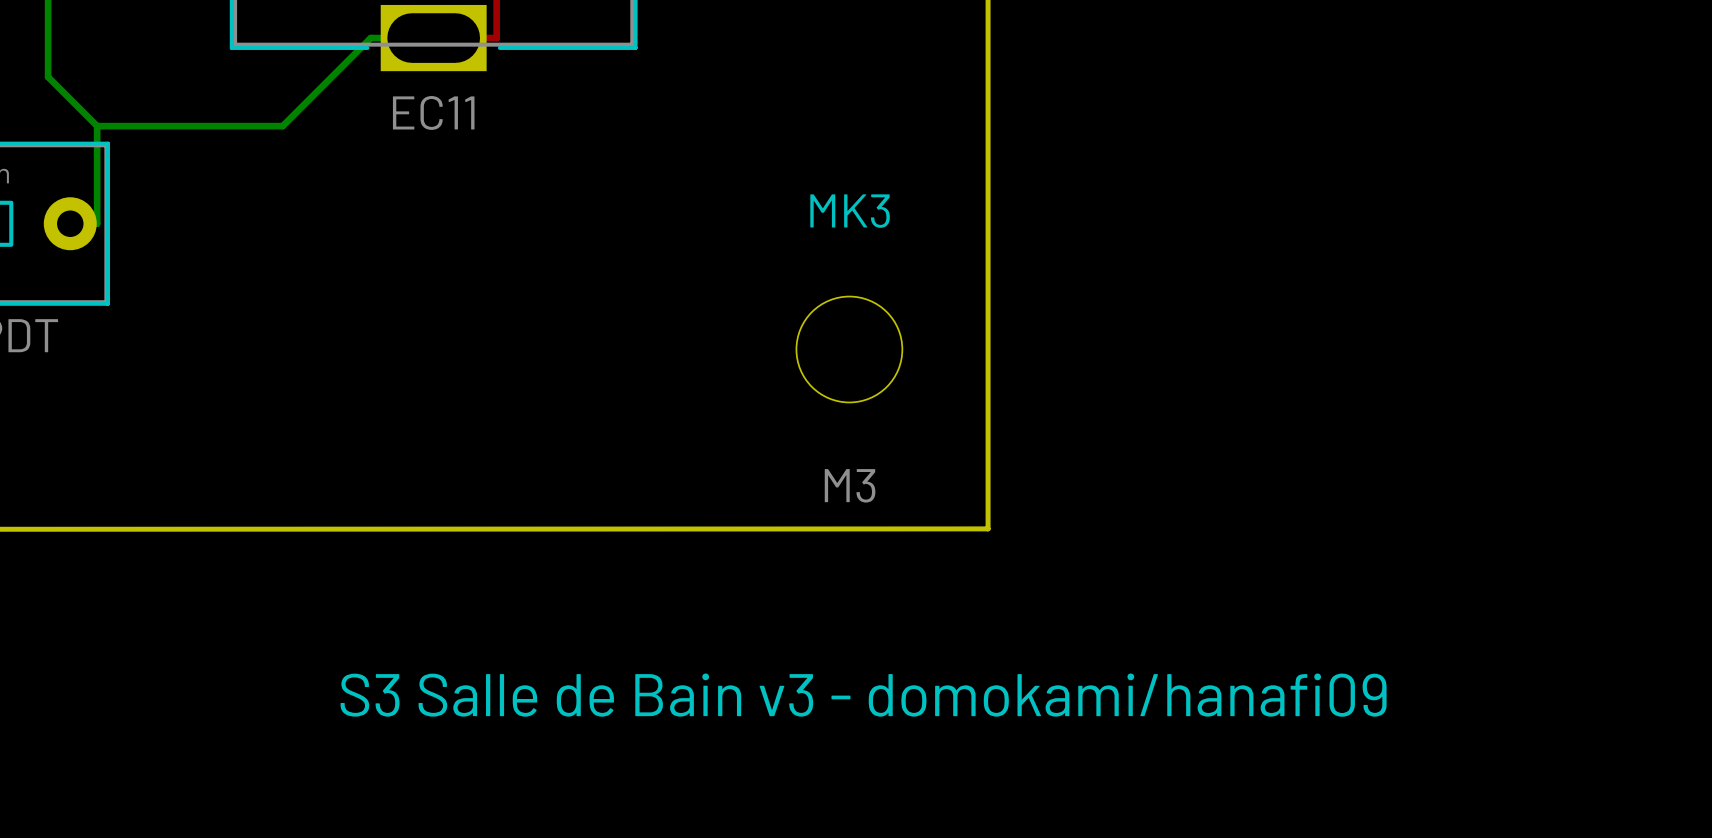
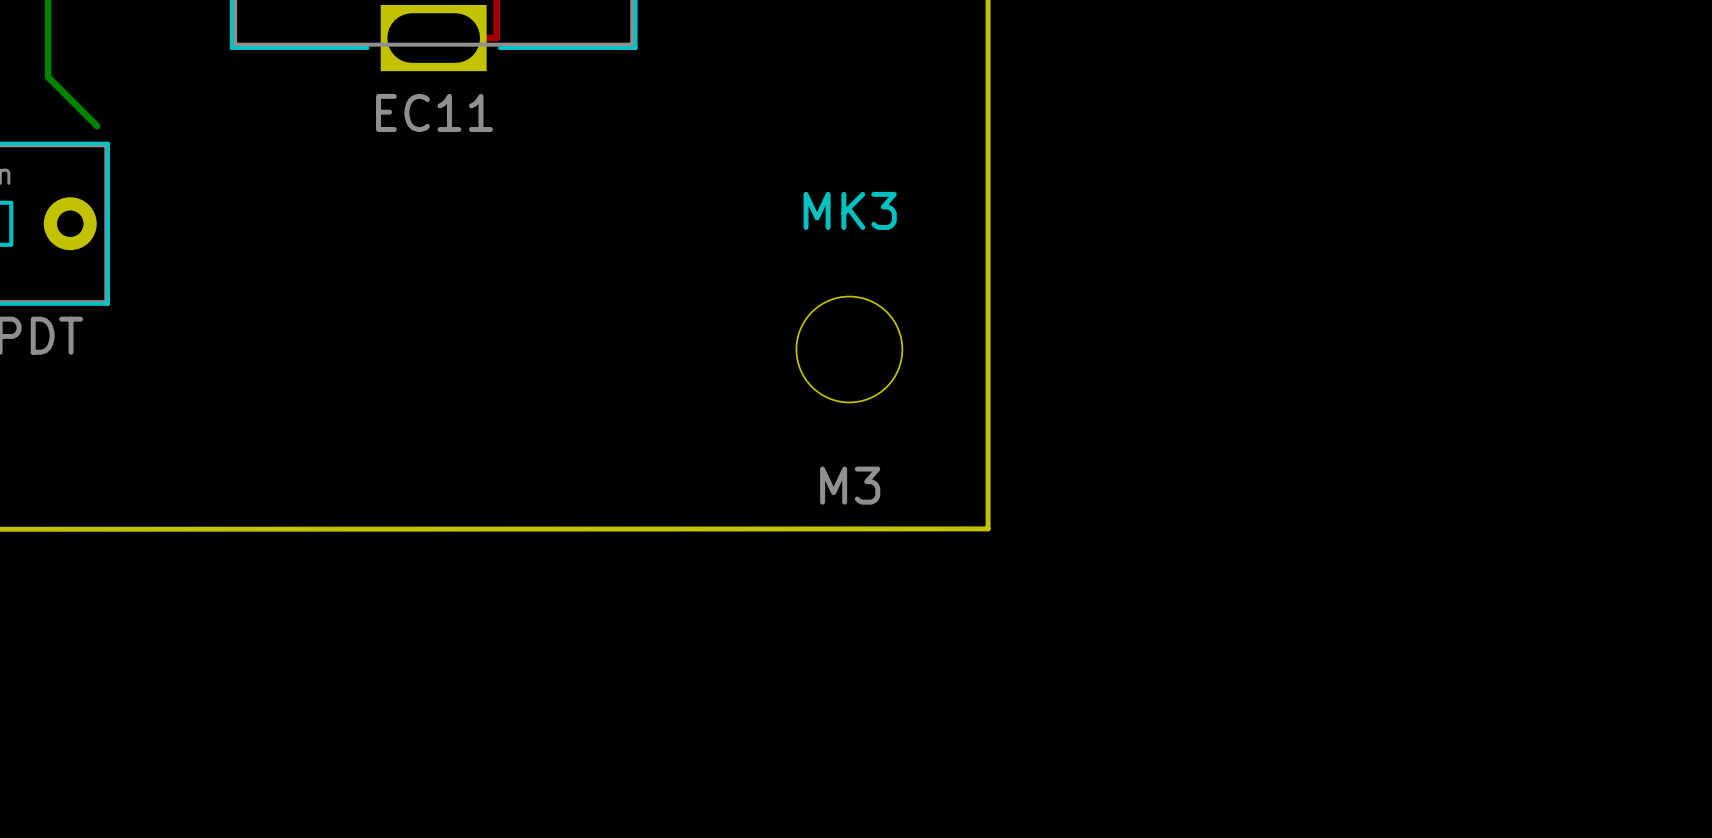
bottom track: (433, 38) (370, 38) (282, 126) (97, 126) (97, 223) (70, 223) -> none
text: S3 Salle de Bain v3 - domokami/hanafi09 (863, 695) -> none

